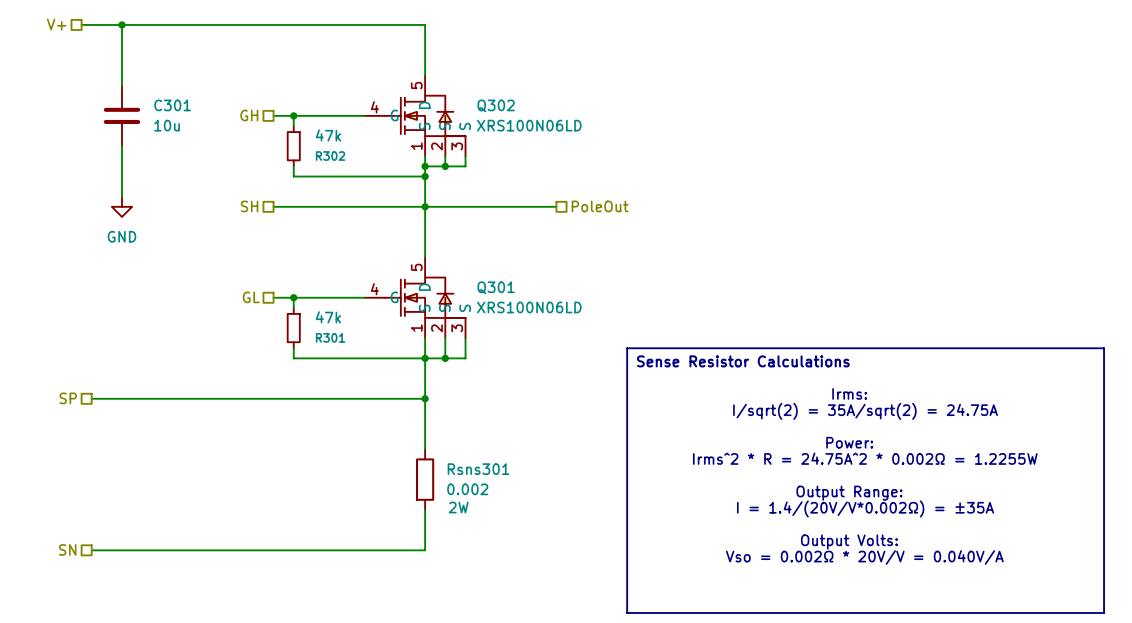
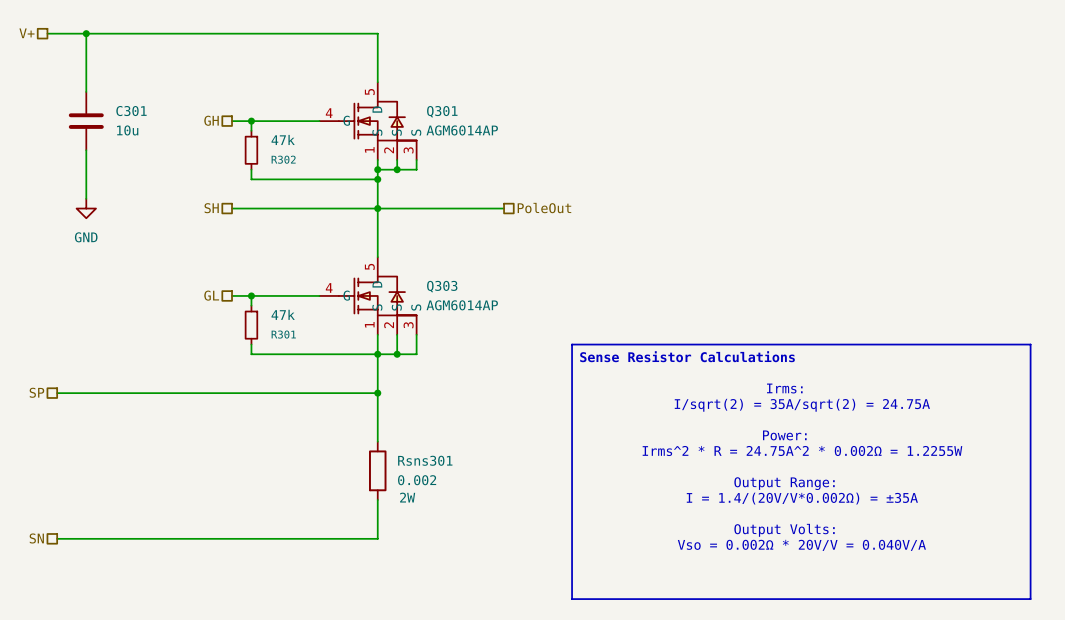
Q302 name: Q302 (496, 105) -> Q301 (442, 111)
Q302 value: XRS100N06LD (529, 125) -> AGM6014AP (462, 130)
Q301 name: Q301 (496, 287) -> Q303 (442, 286)
Q301 value: XRS100N06LD (529, 307) -> AGM6014AP (462, 305)

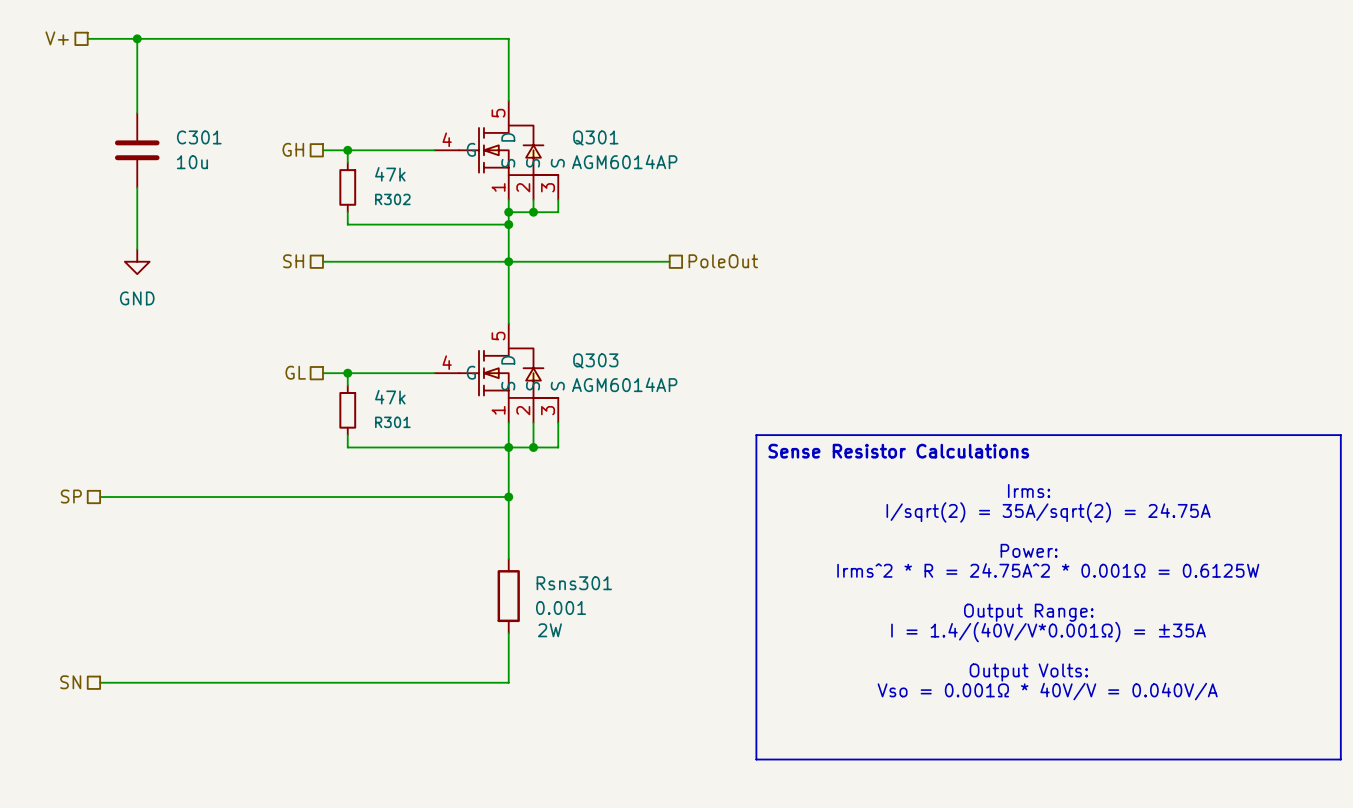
text: Irms^2 * R = 24.75A^2 * 0.002Ω = 1.2255W (802, 450) -> Irms^2 * R = 24.75A^2 * 0.001Ω = 0.6125W (1048, 570)
Rsns301 value: 0.002 (417, 480) -> 0.001 (561, 607)
text: I = 1.4/(20V/V*0.002Ω) = ±35A (802, 498) -> I = 1.4/(40V/V*0.001Ω) = ±35A (1048, 632)
text: Vso = 0.002Ω * 20V/V = 0.040V/A (801, 545) -> Vso = 0.001Ω * 40V/V = 0.040V/A (1047, 691)

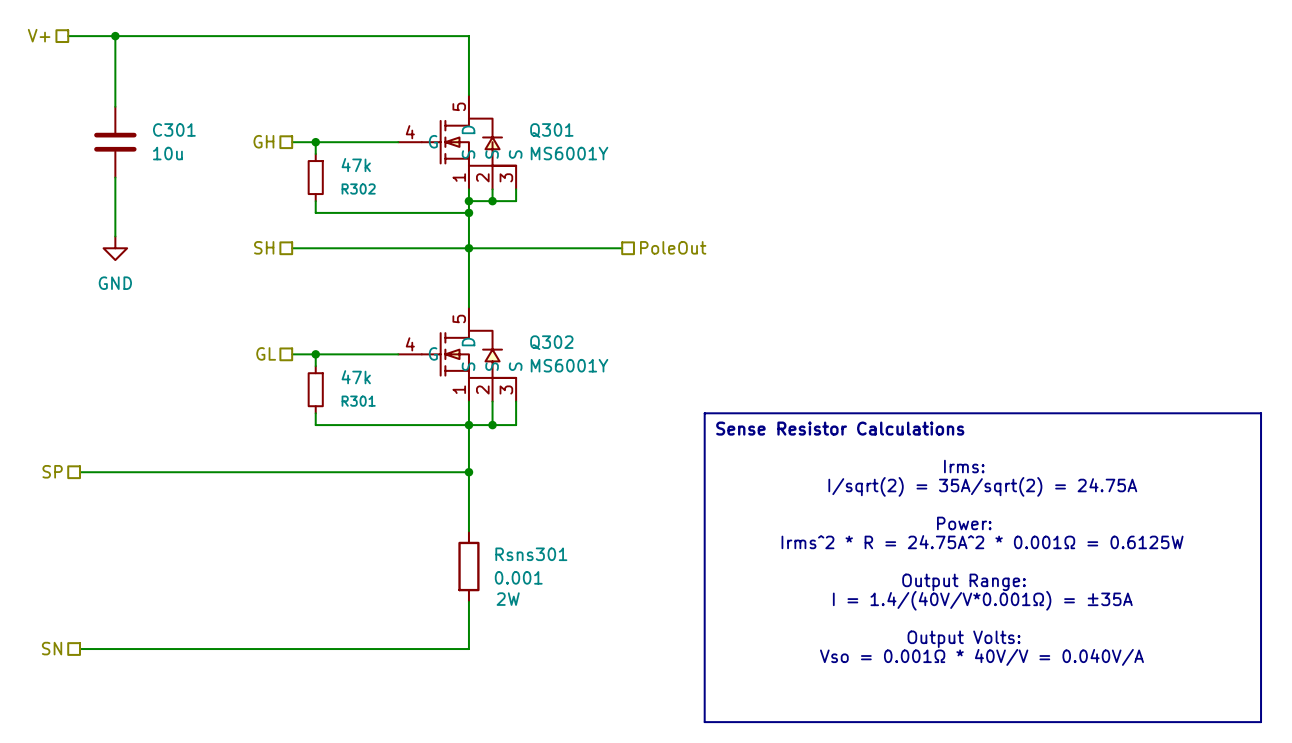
Q301 value: AGM6014AP (624, 161) -> MS6001Y (569, 153)
Q303: AGM6014AP (496, 373) -> none
Q302: none -> MS6001Y (457, 354)

